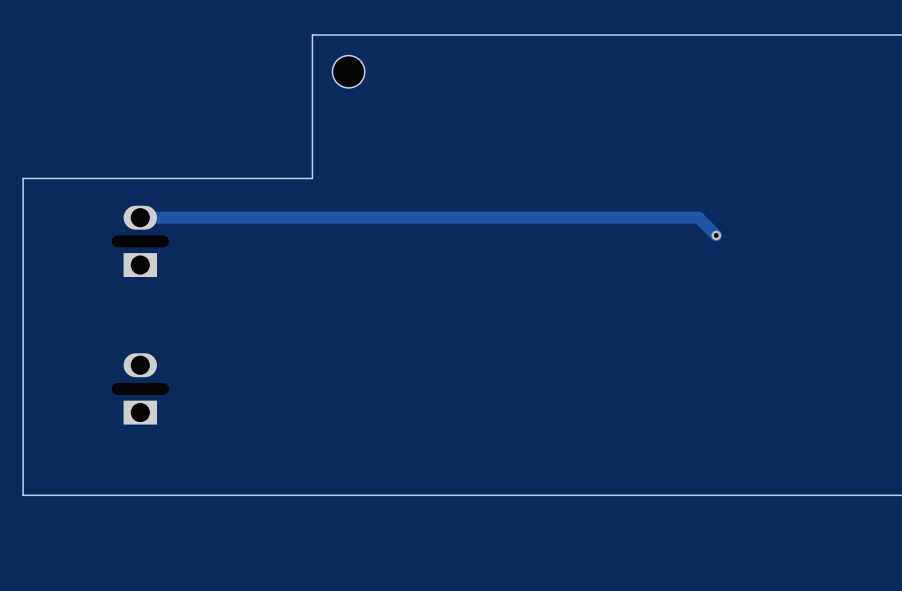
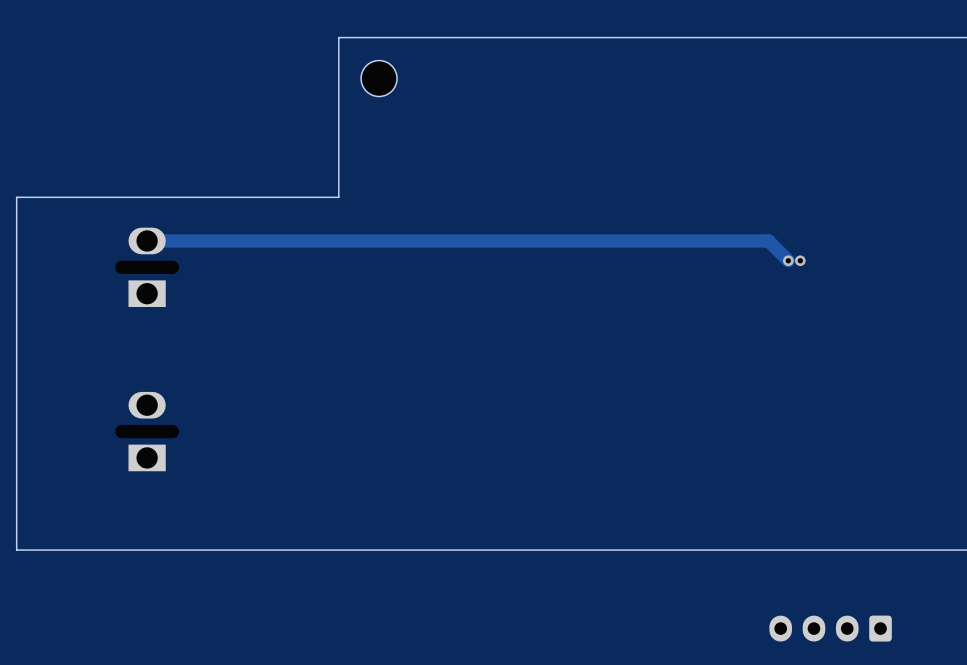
via: none -> (800, 260)
part: none -> (830, 628)

